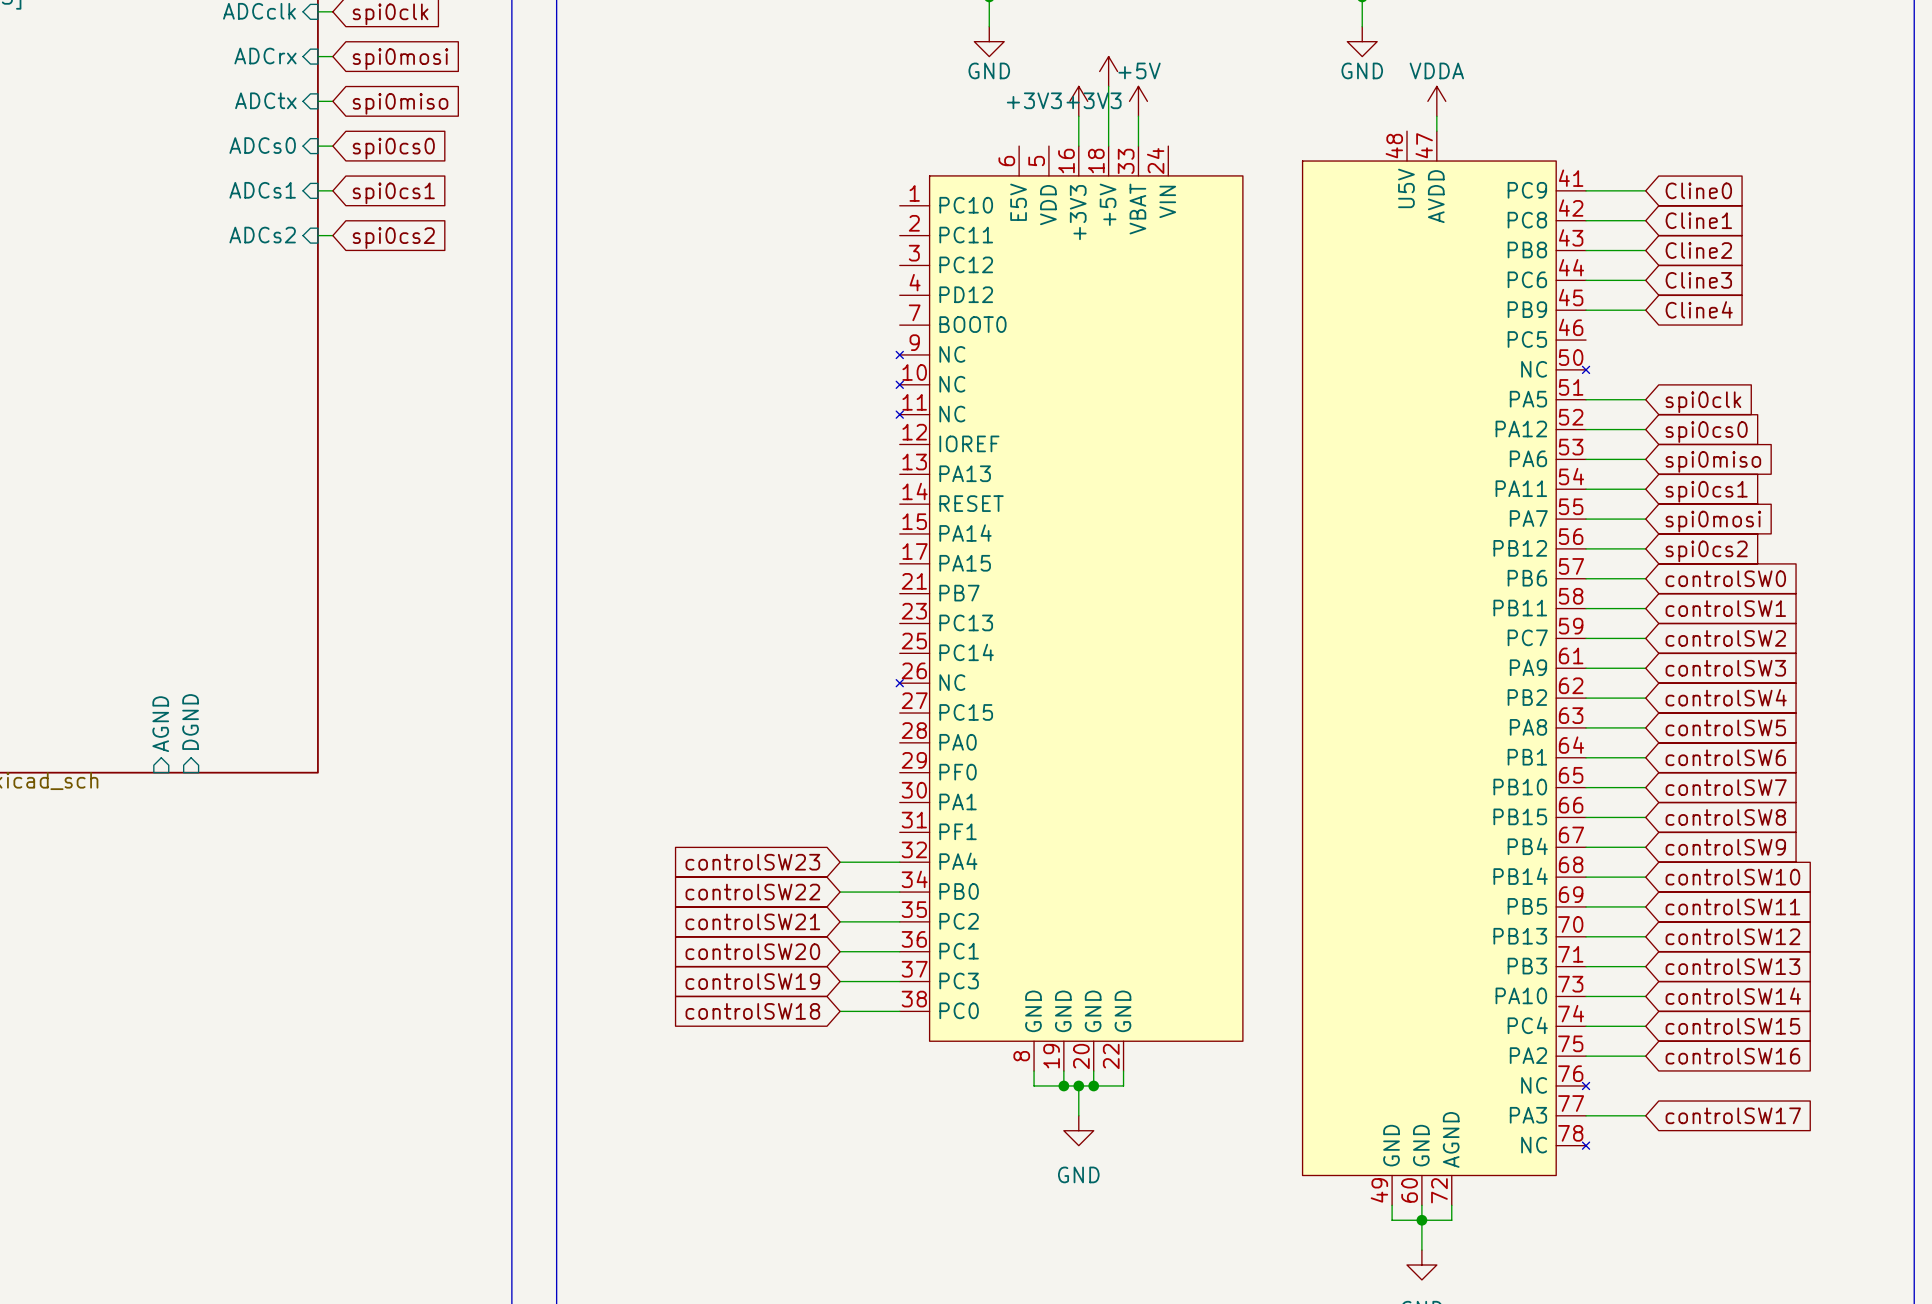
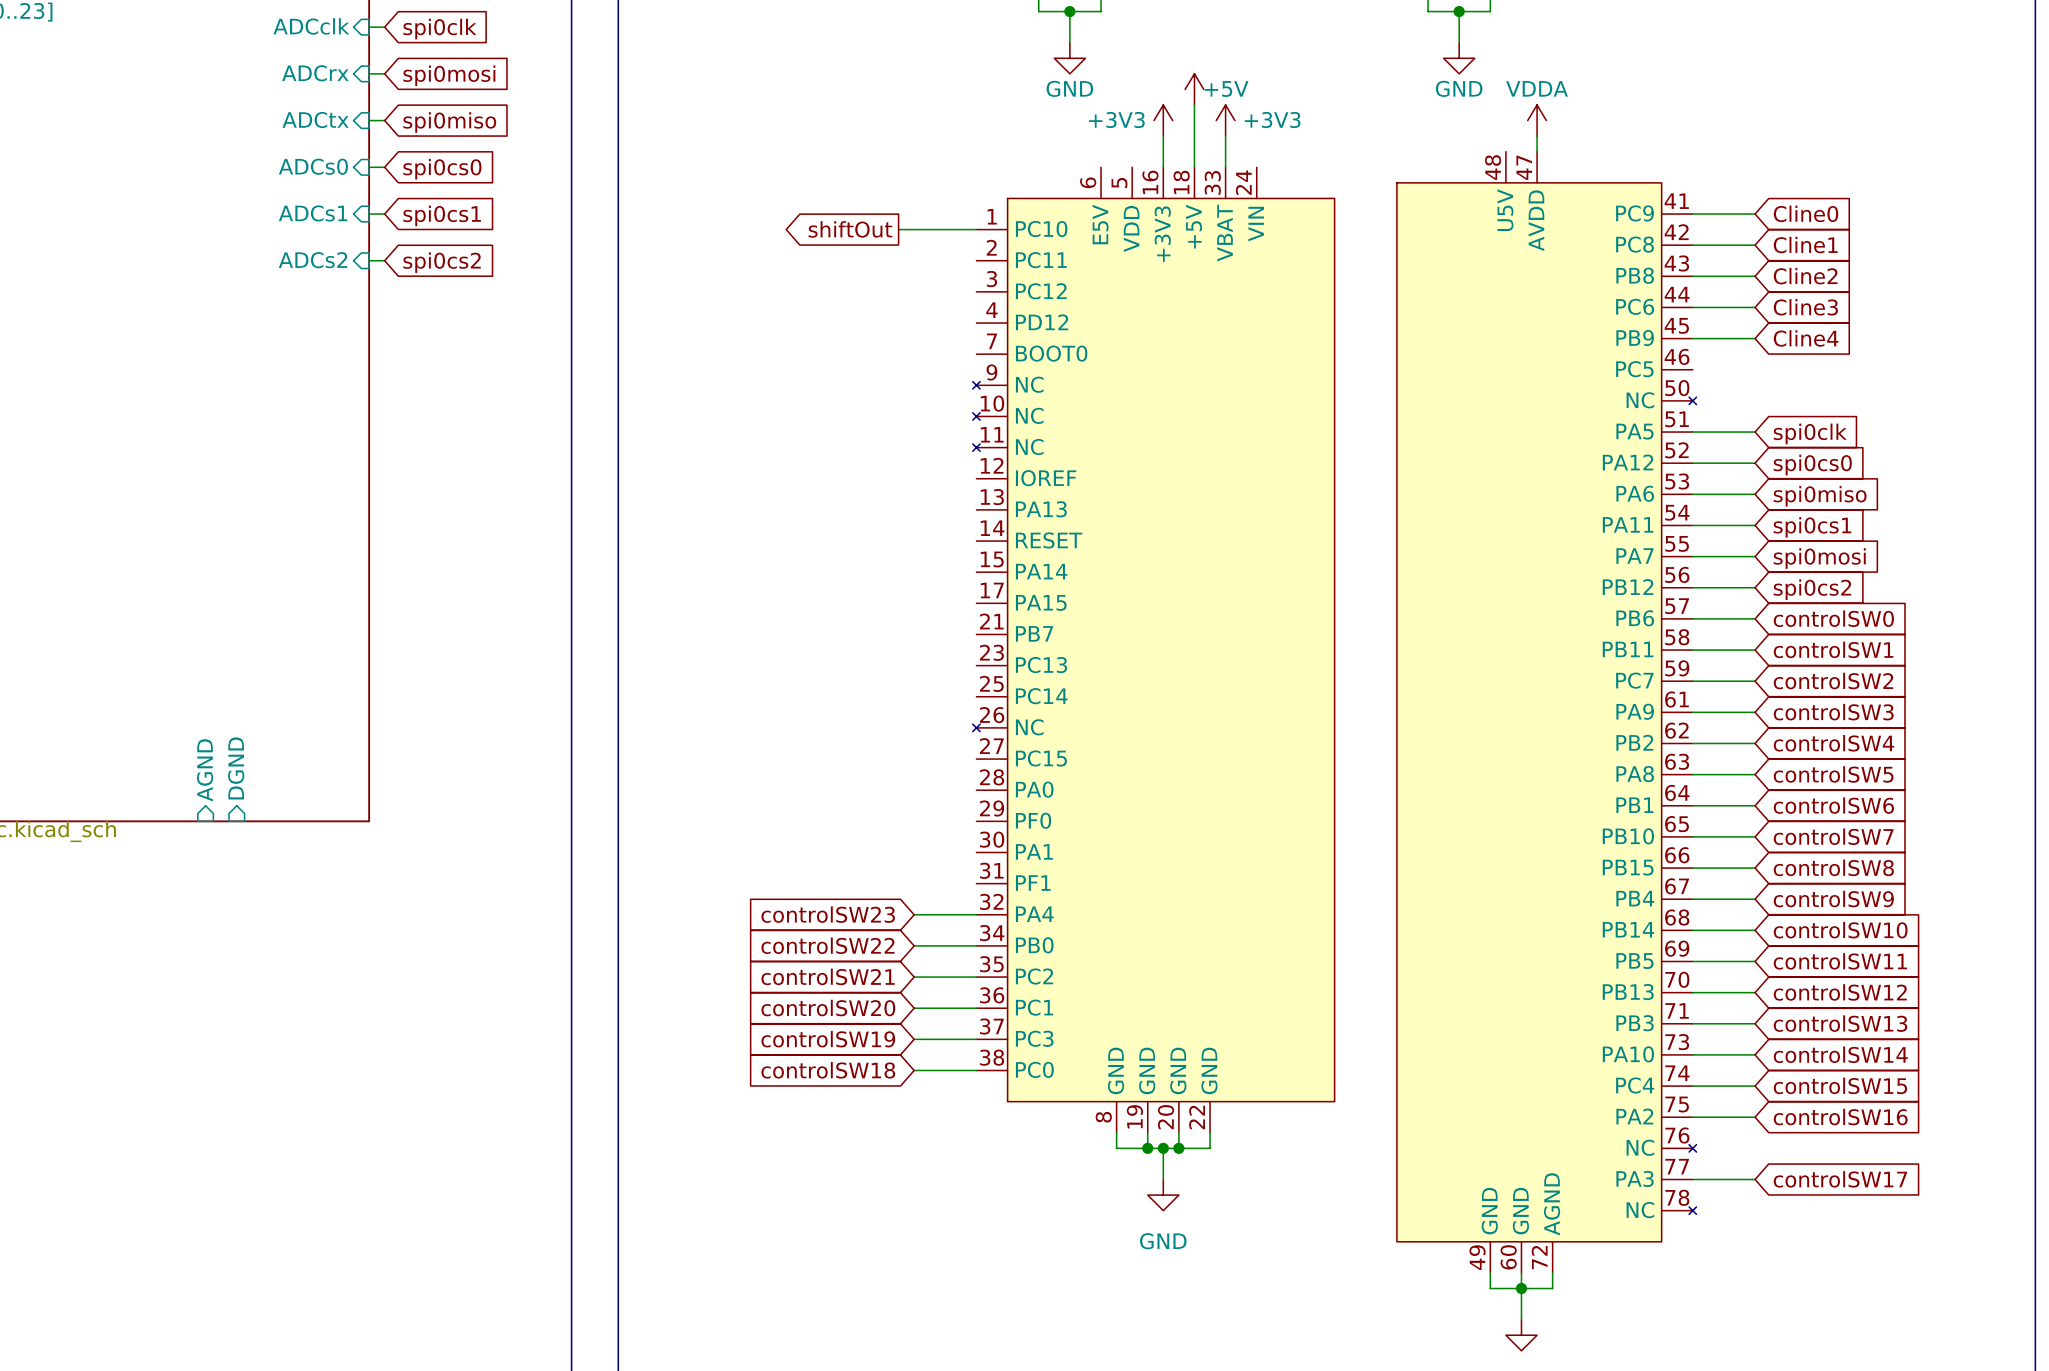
power symbol text position: +3V3 (1094, 100) -> +3V3 (1272, 120)
global label: none -> shiftOut (850, 229)
wire: none -> (898, 229) (976, 229)

